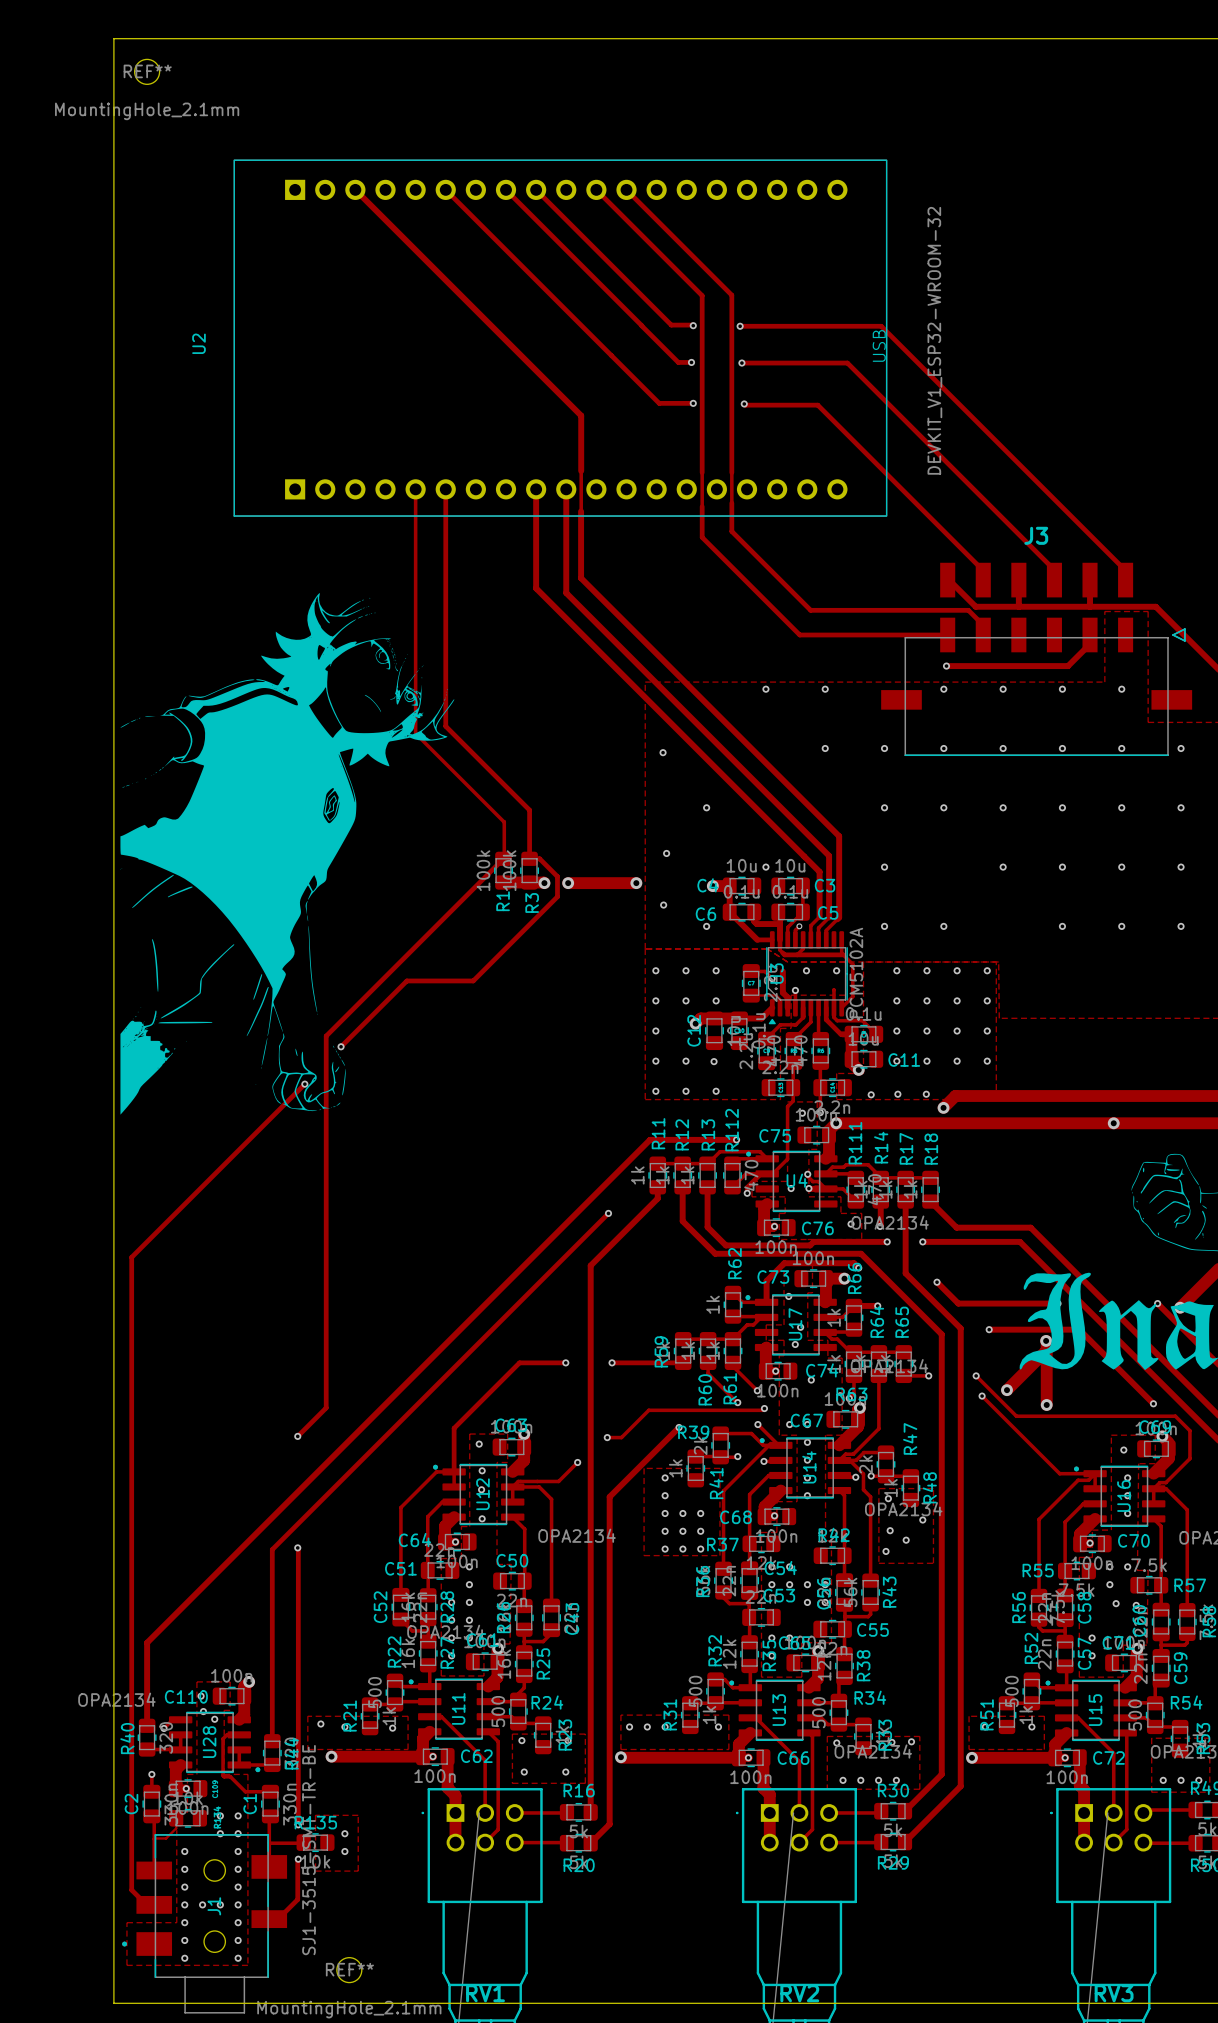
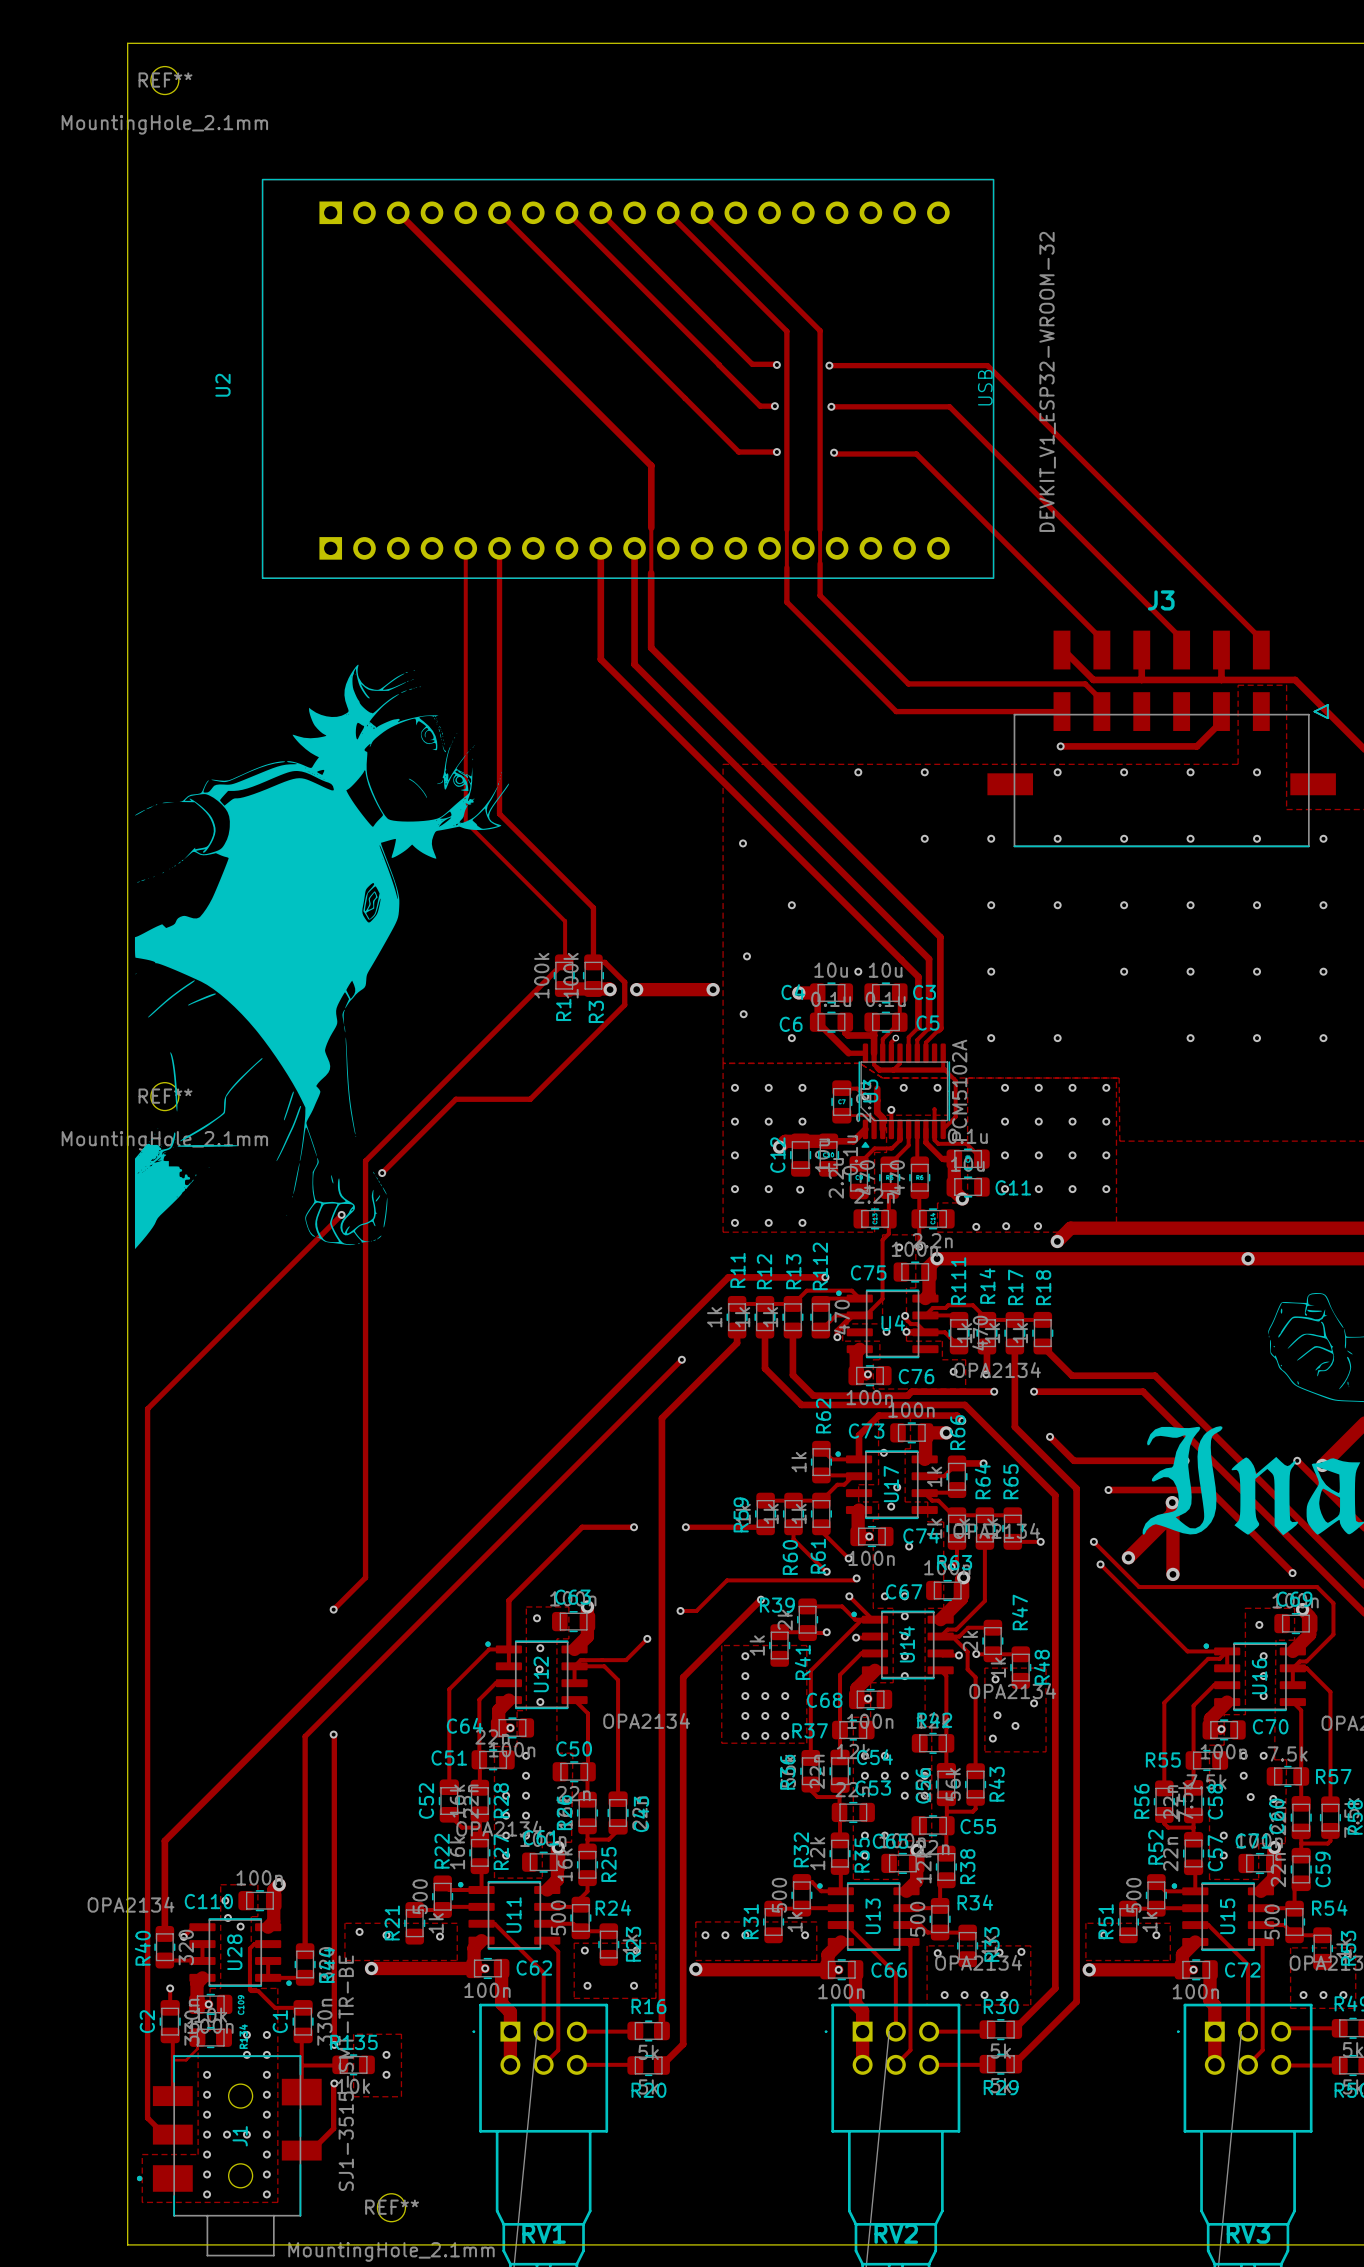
REF**: none -> MountingHole_2.1mm (164, 1096)

